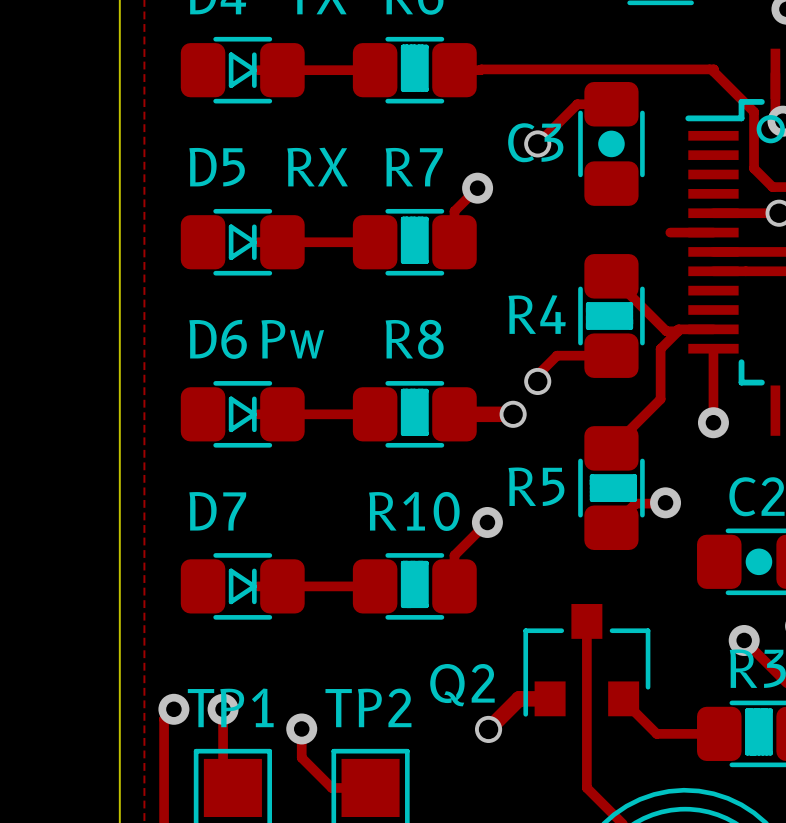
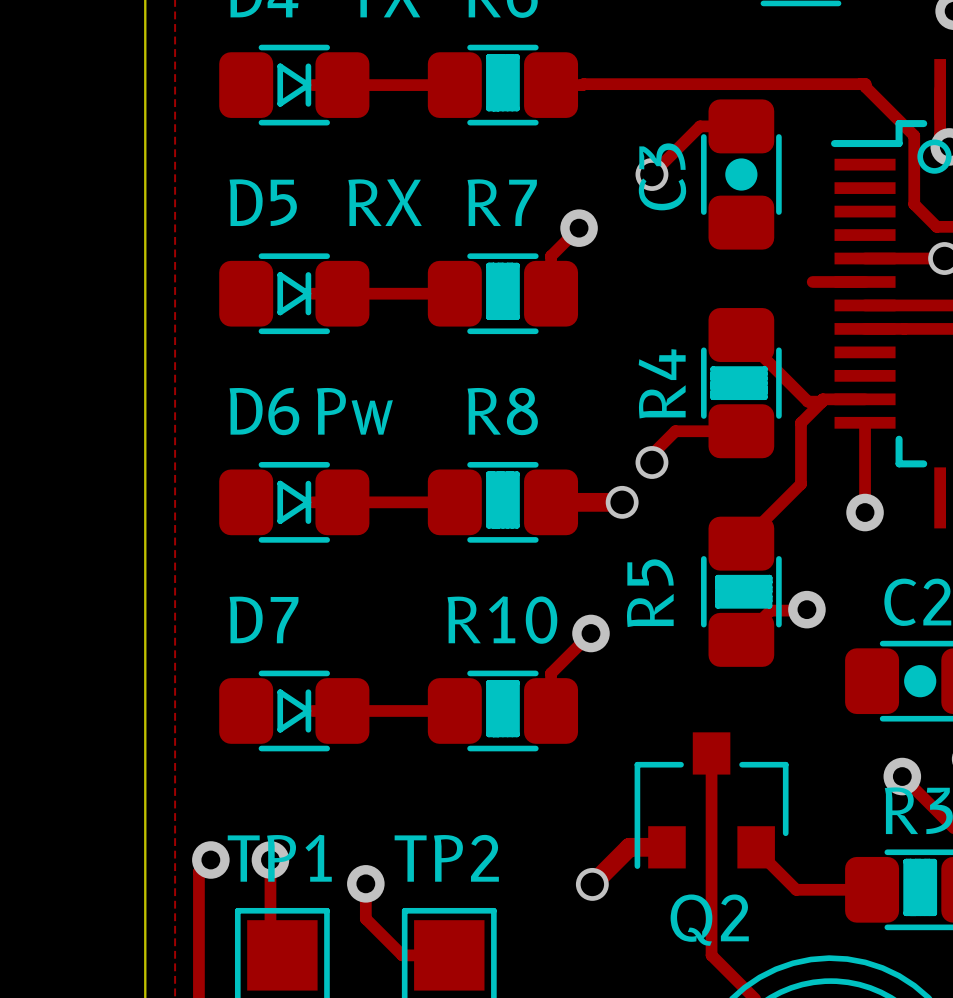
C3 name rotation: 0° (535, 142) -> 90° counterclockwise (662, 176)
R4 name rotation: 0° (537, 314) -> 90° counterclockwise (662, 383)
R5 name rotation: 0° (536, 486) -> 90° counterclockwise (650, 593)
Q2 name position: Q2 (462, 685) -> Q2 (709, 920)

